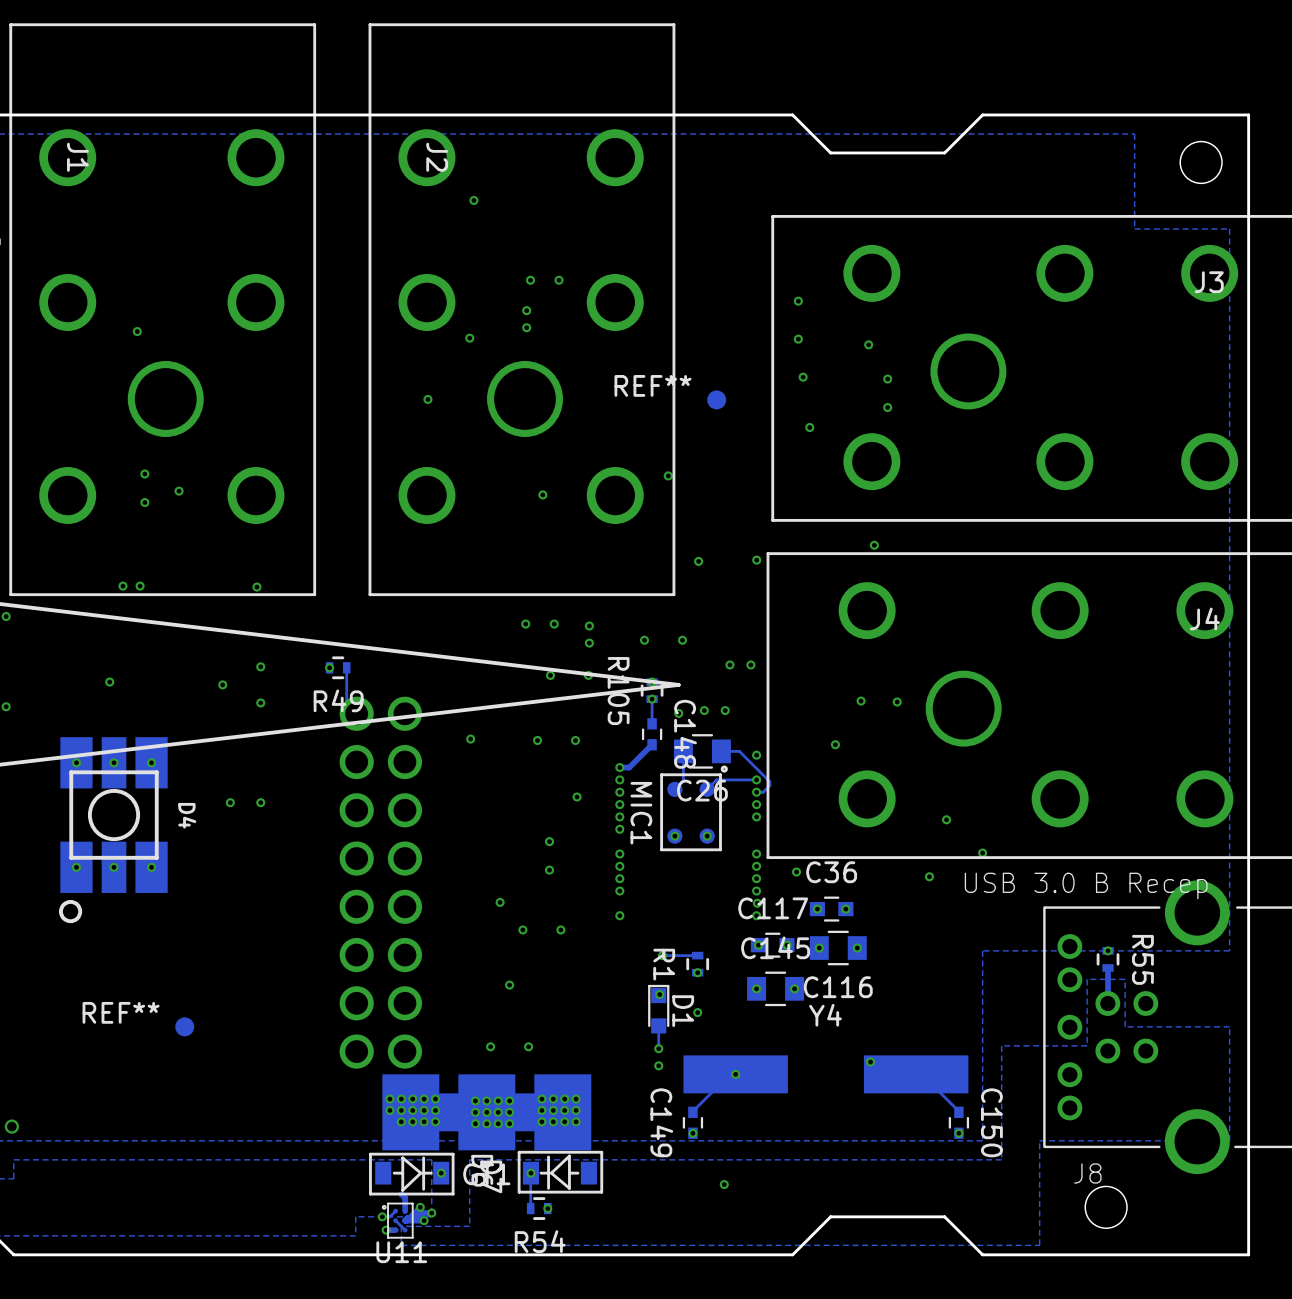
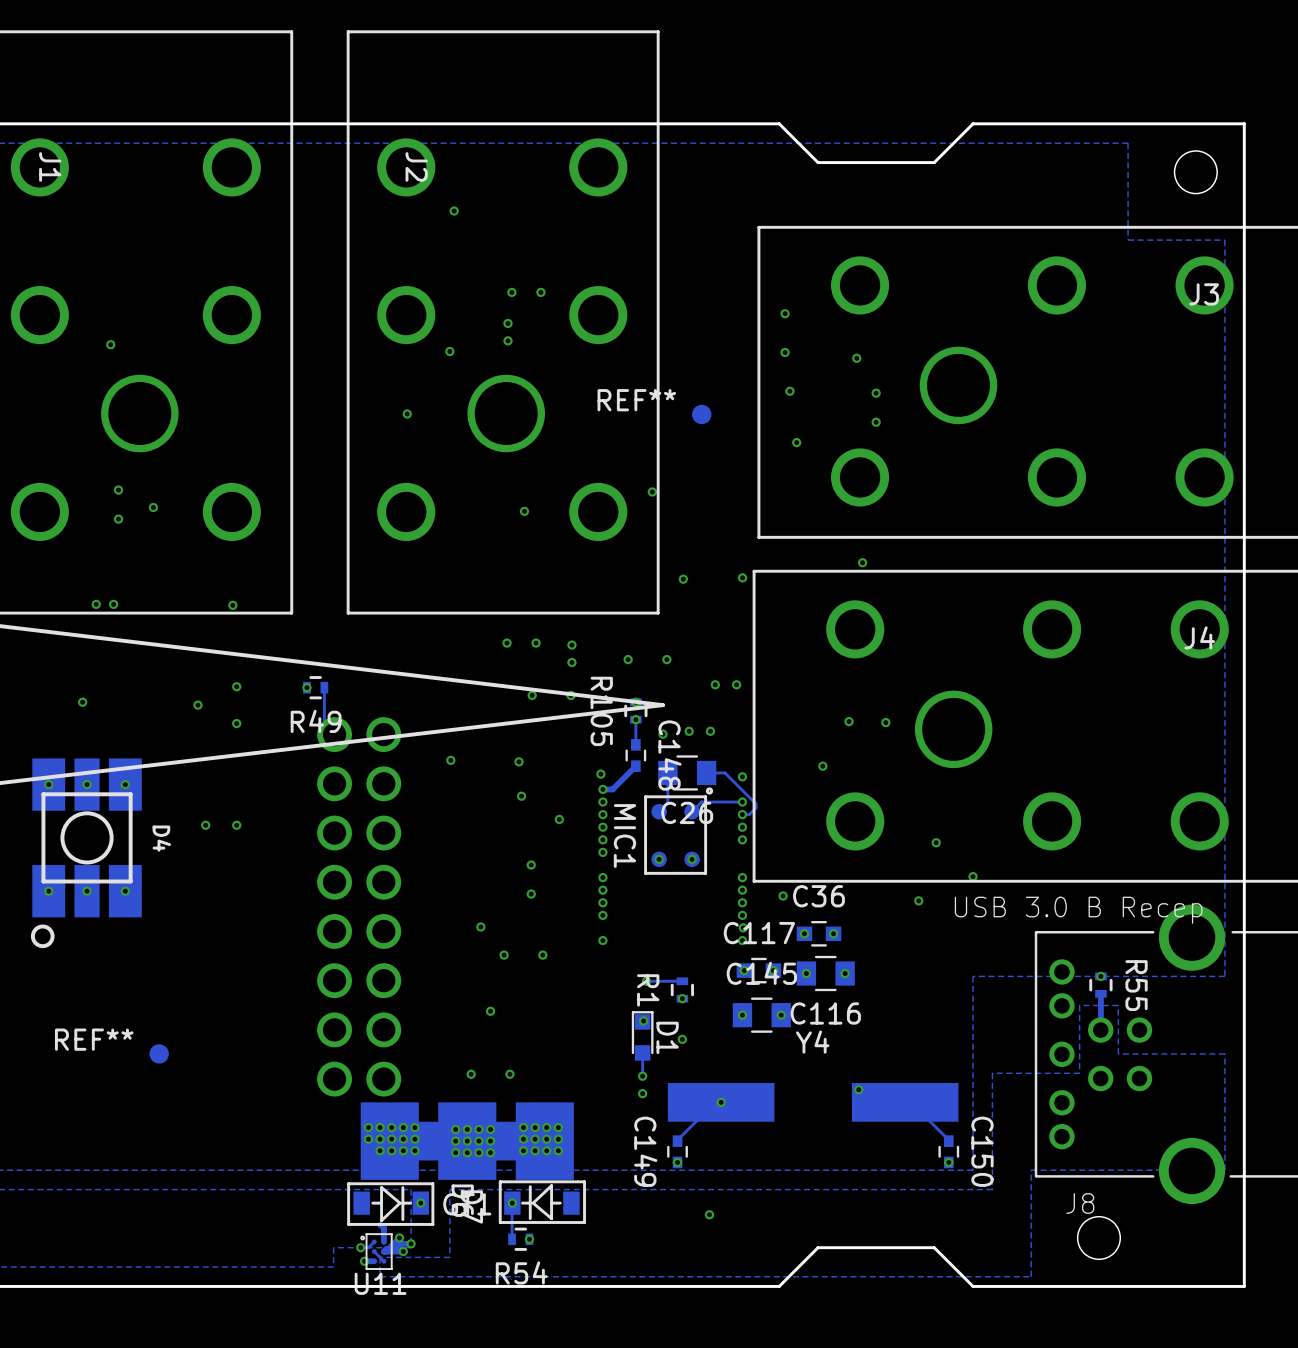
via: (575, 740) -> none
via: none -> (600, 774)
via: none -> (521, 796)

